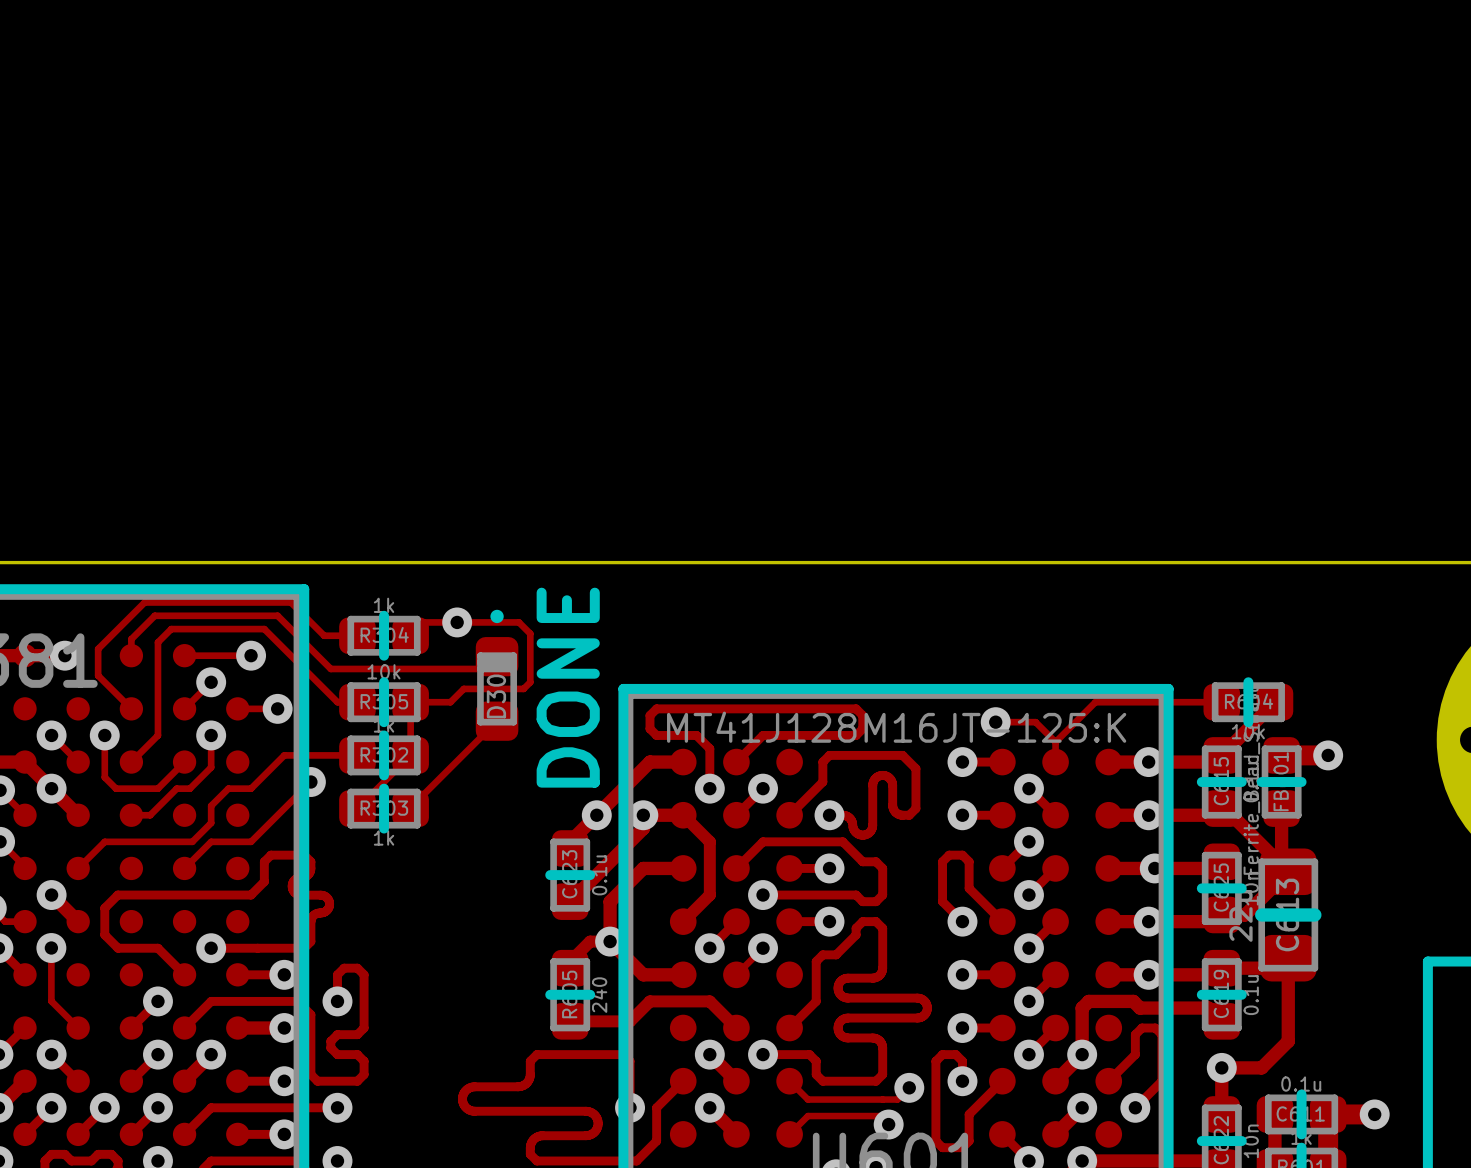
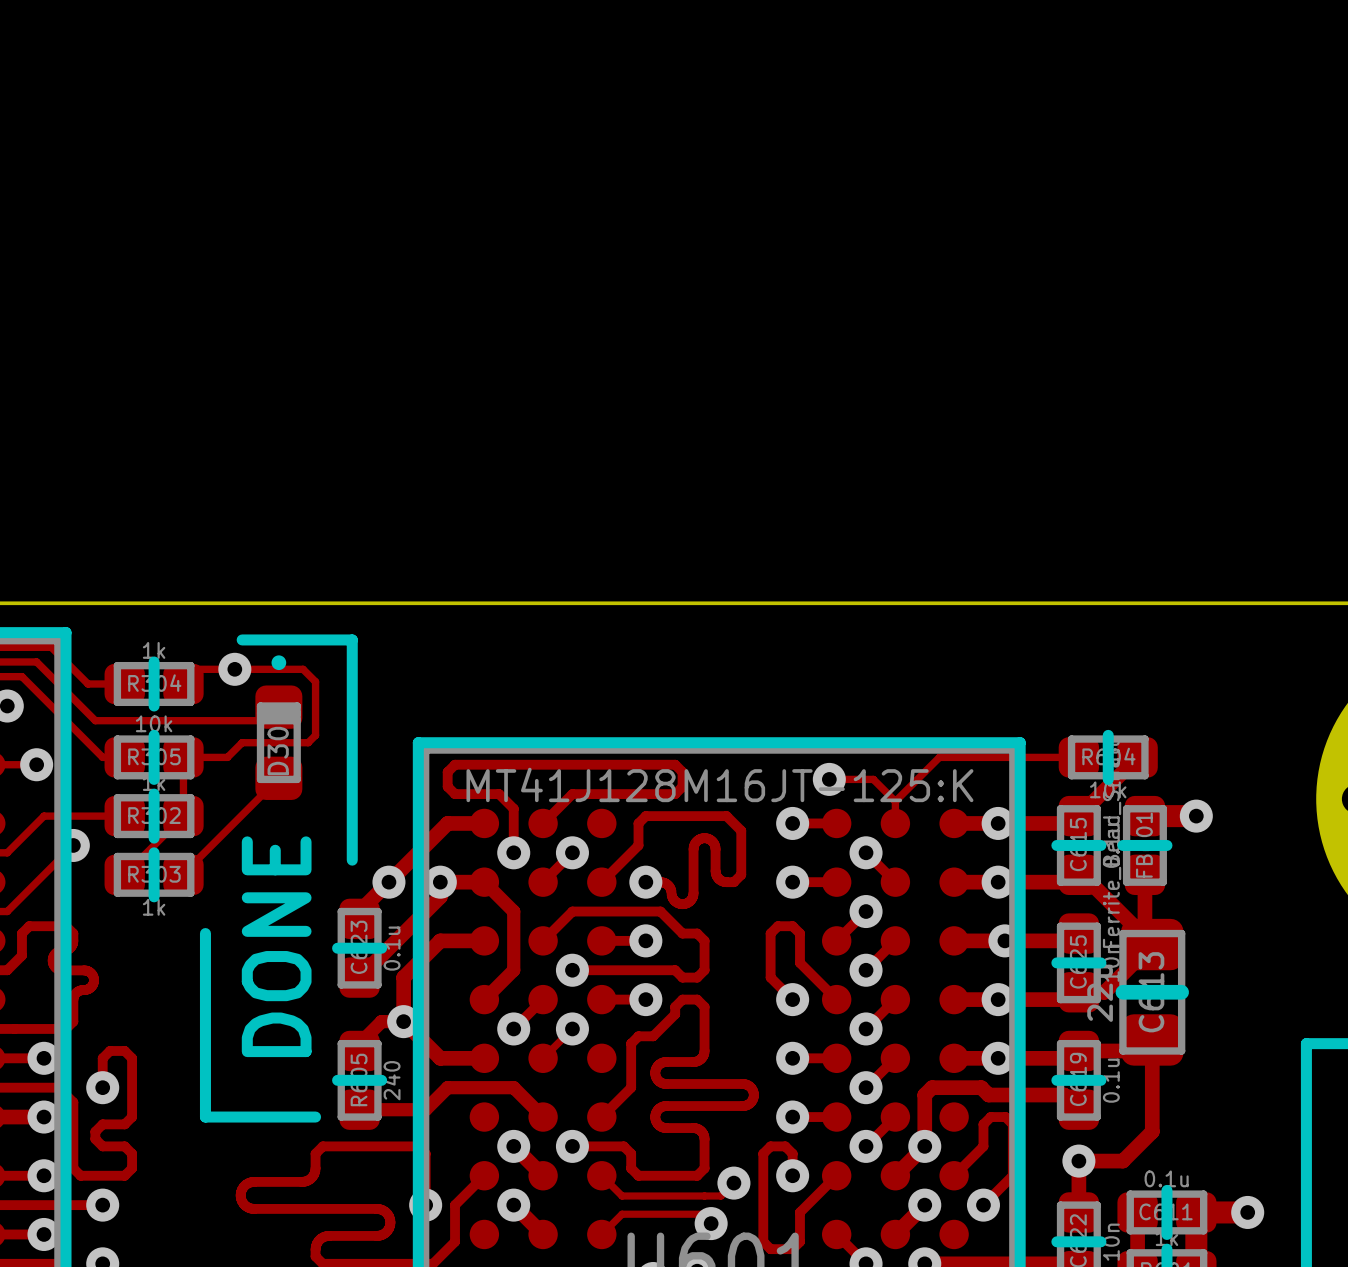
line: none -> (242, 639) (352, 639) (352, 860)
text position: DONE (568, 687) -> DONE (276, 946)
line: none -> (205, 933) (205, 1117) (315, 1117)

